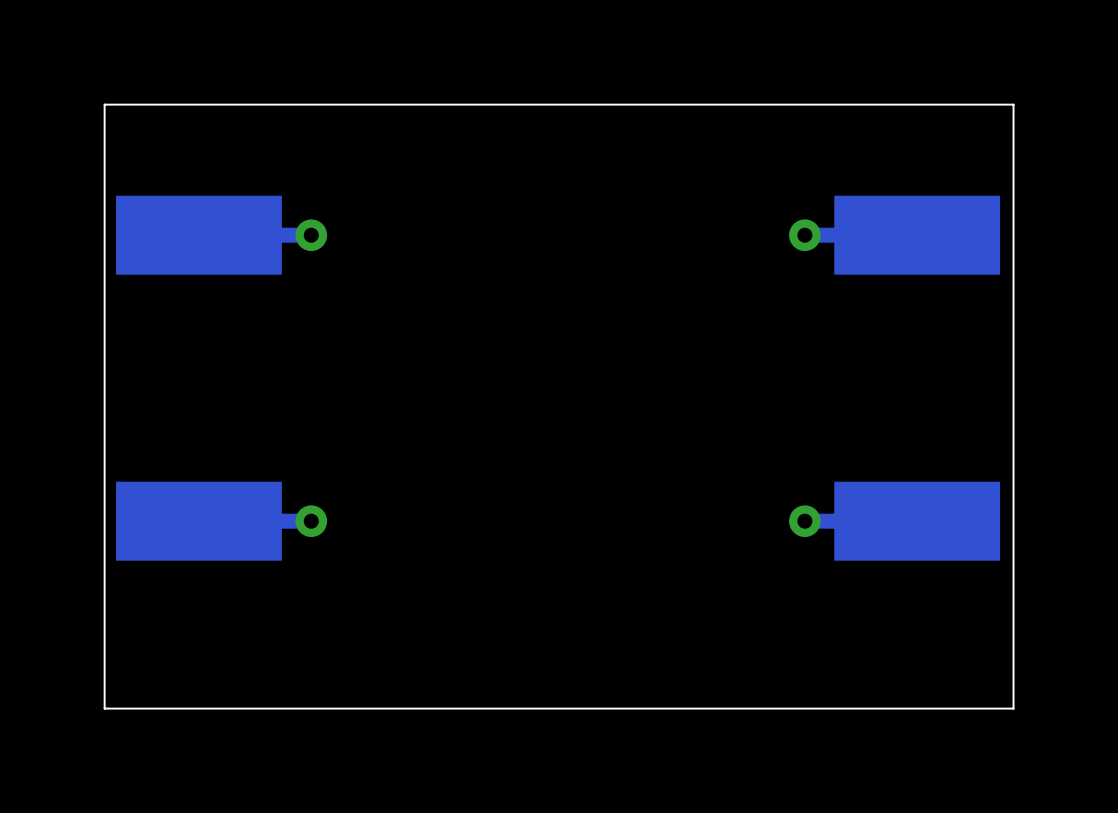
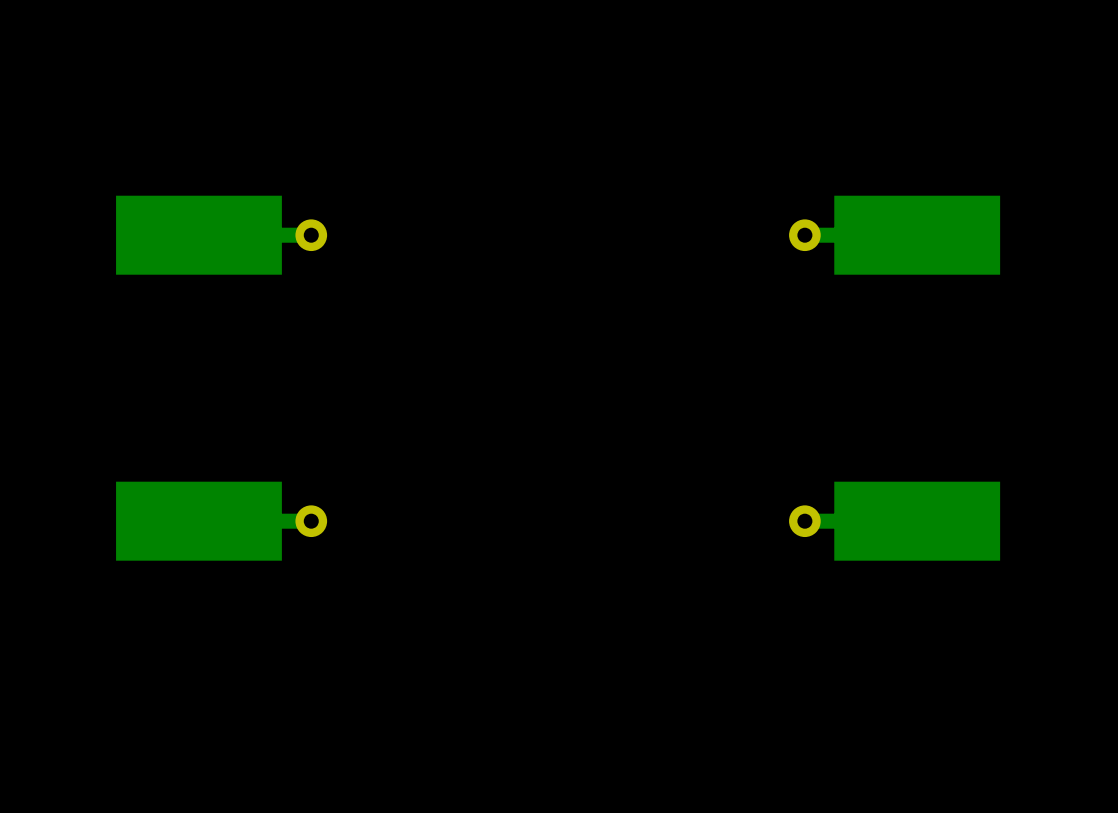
board edge: (1013, 104) (104, 104) (104, 708) (1013, 708) (1013, 104) -> none

